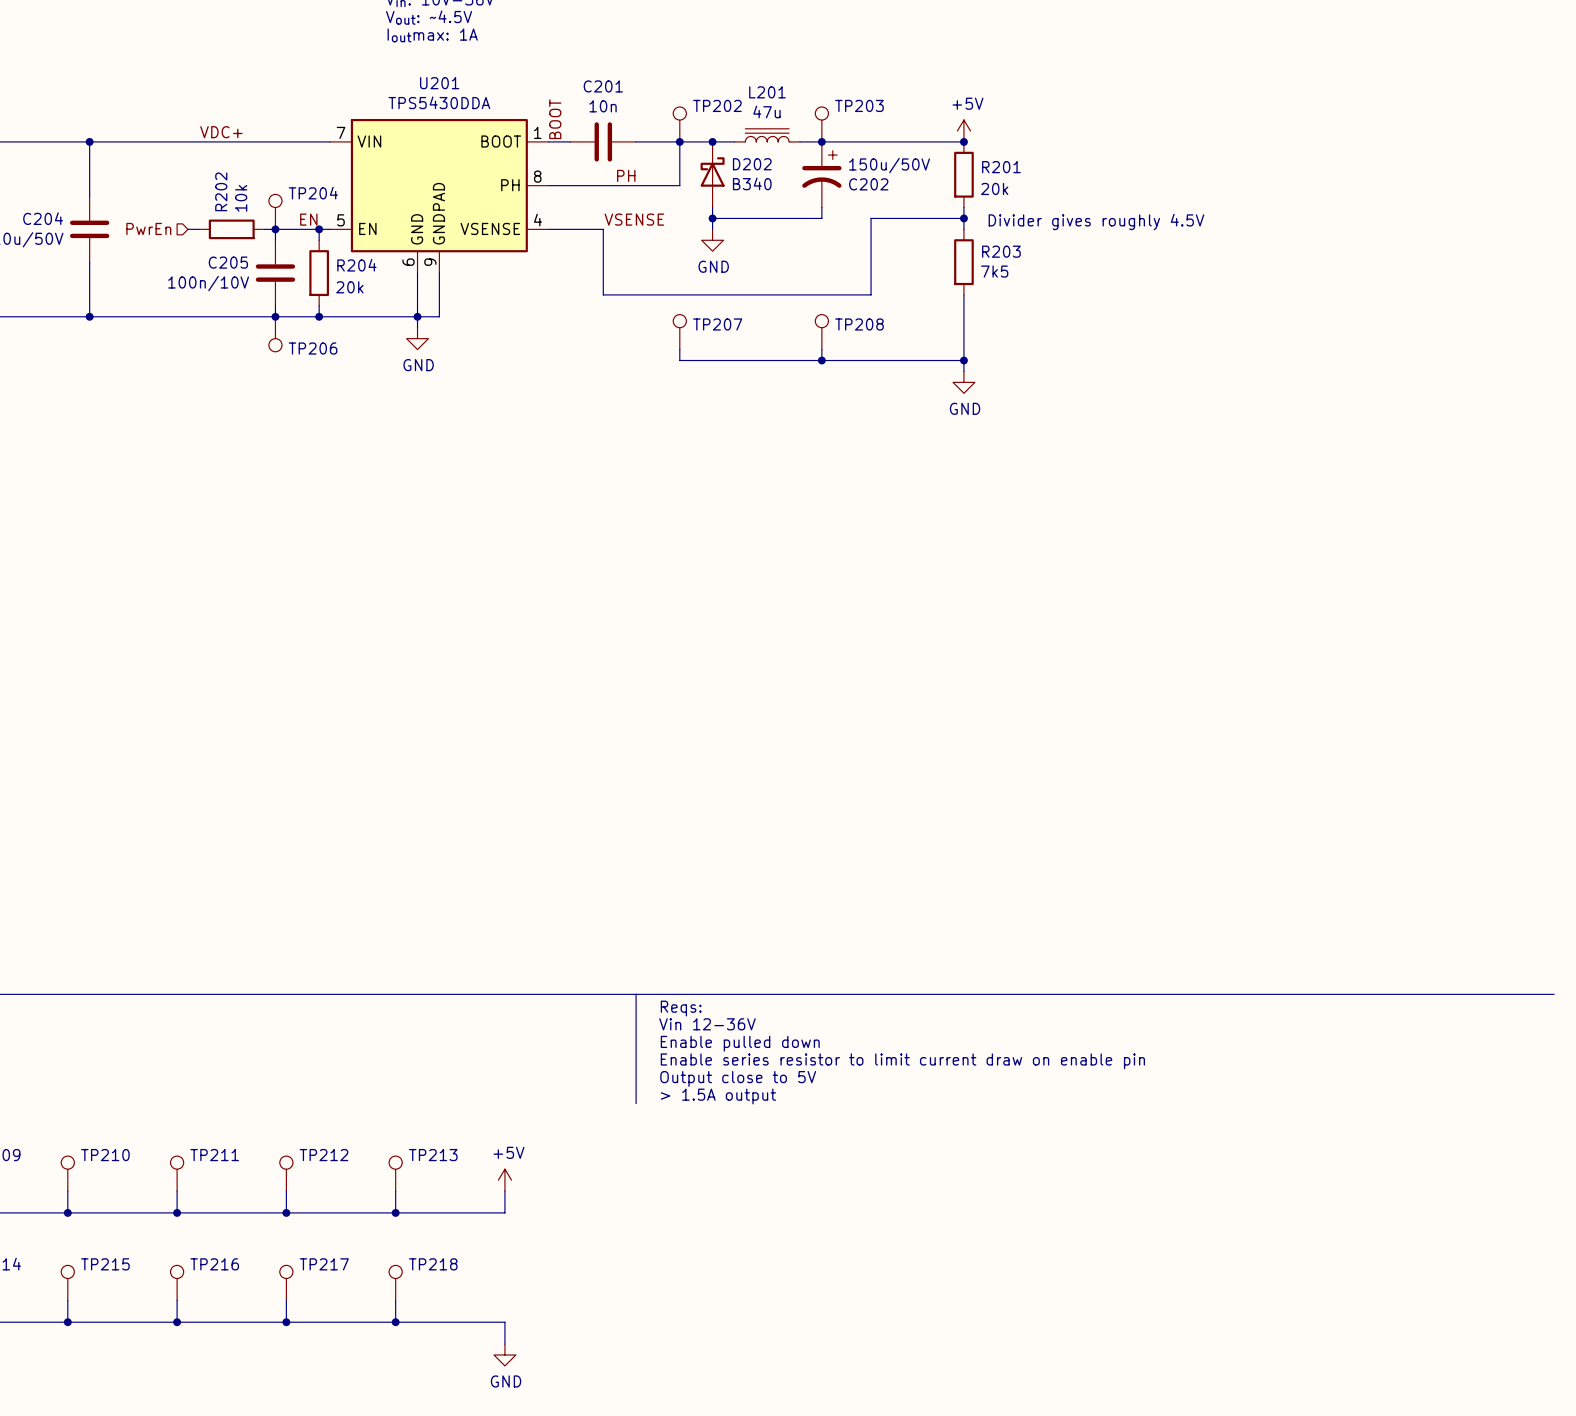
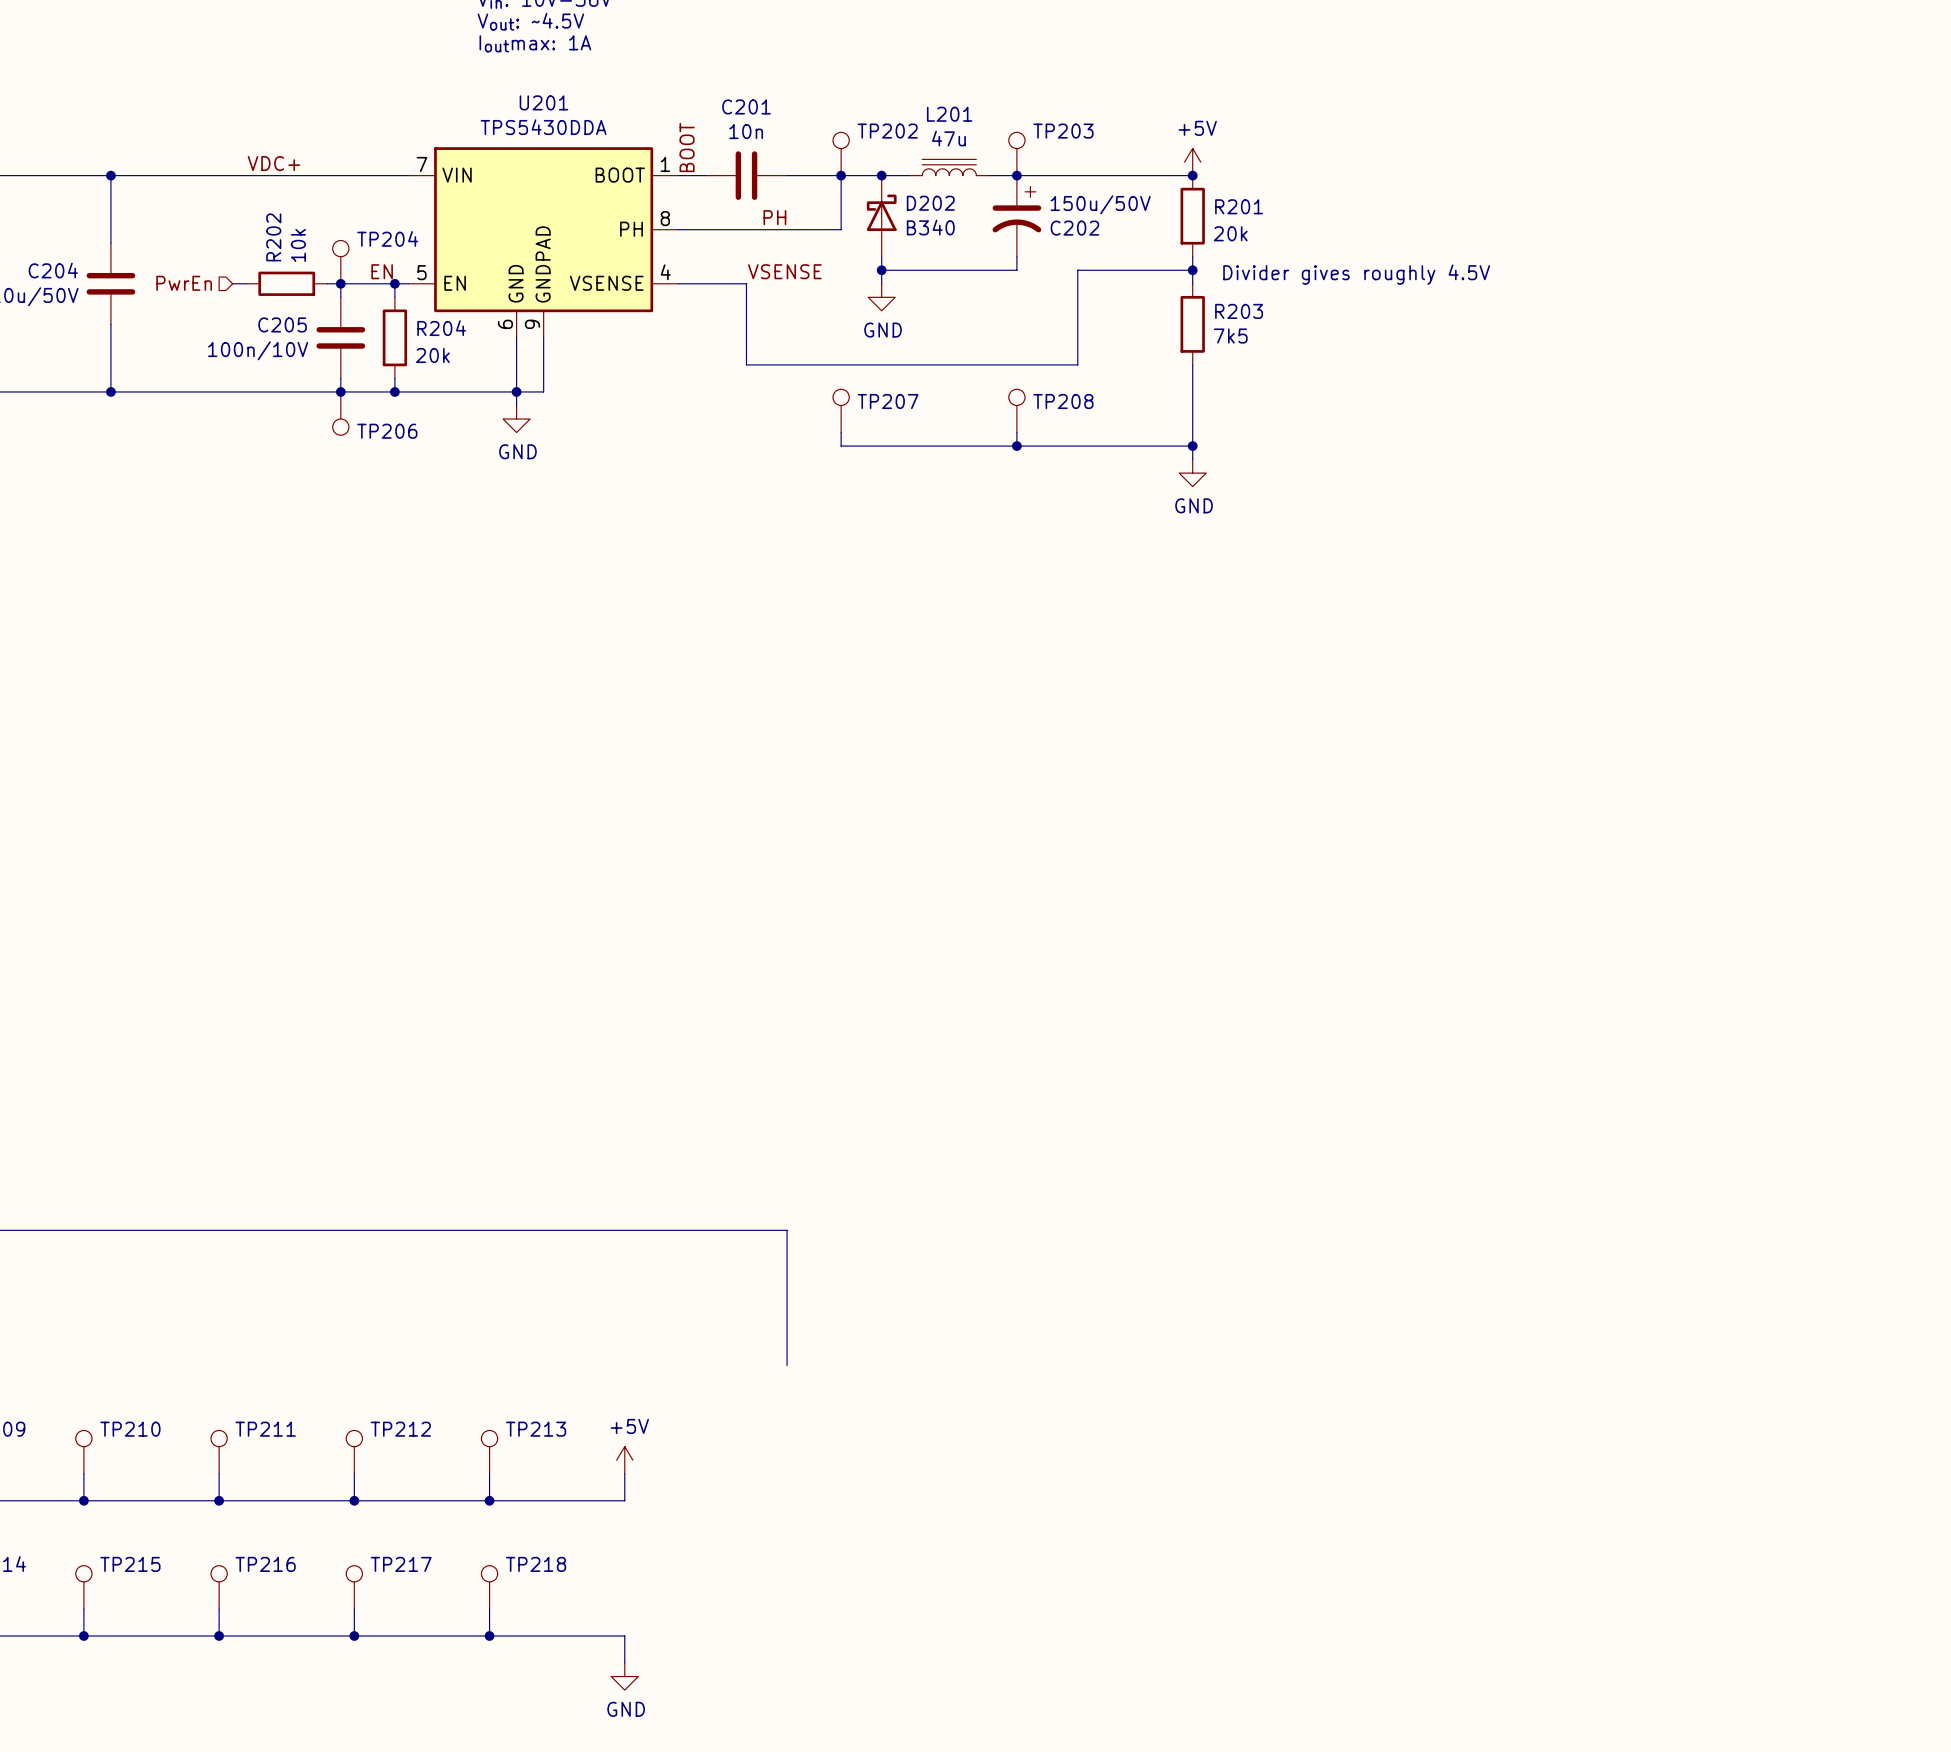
line: (636, 994) (1554, 994) -> none
text: Reqs: (681, 1008) -> none
text: Vin 12-36V (707, 1024) -> none
text: Enable pulled down (740, 1043) -> none
text: Enable series resistor to limit current draw on enable pin (902, 1061) -> none
text: Output close to 5V (738, 1078) -> none
text: > 1.5A output (718, 1096) -> none

